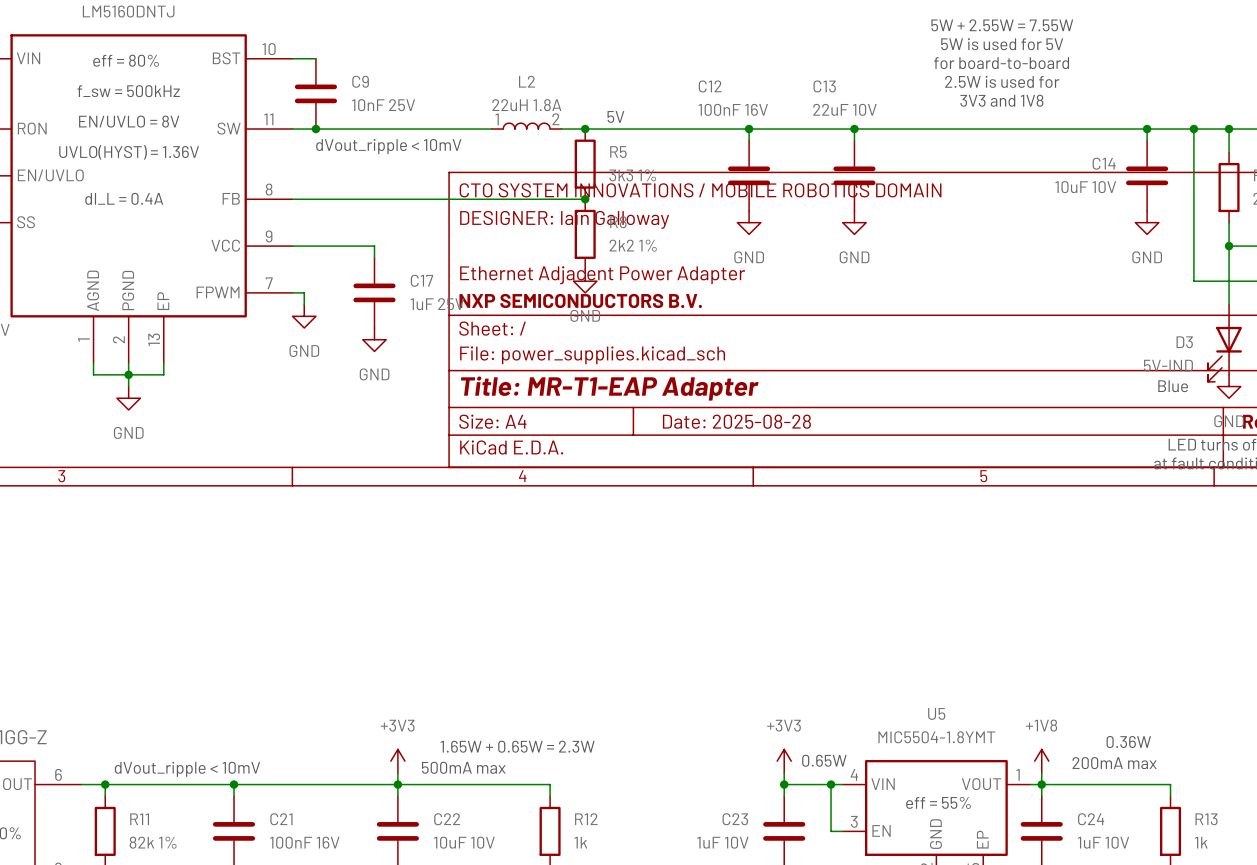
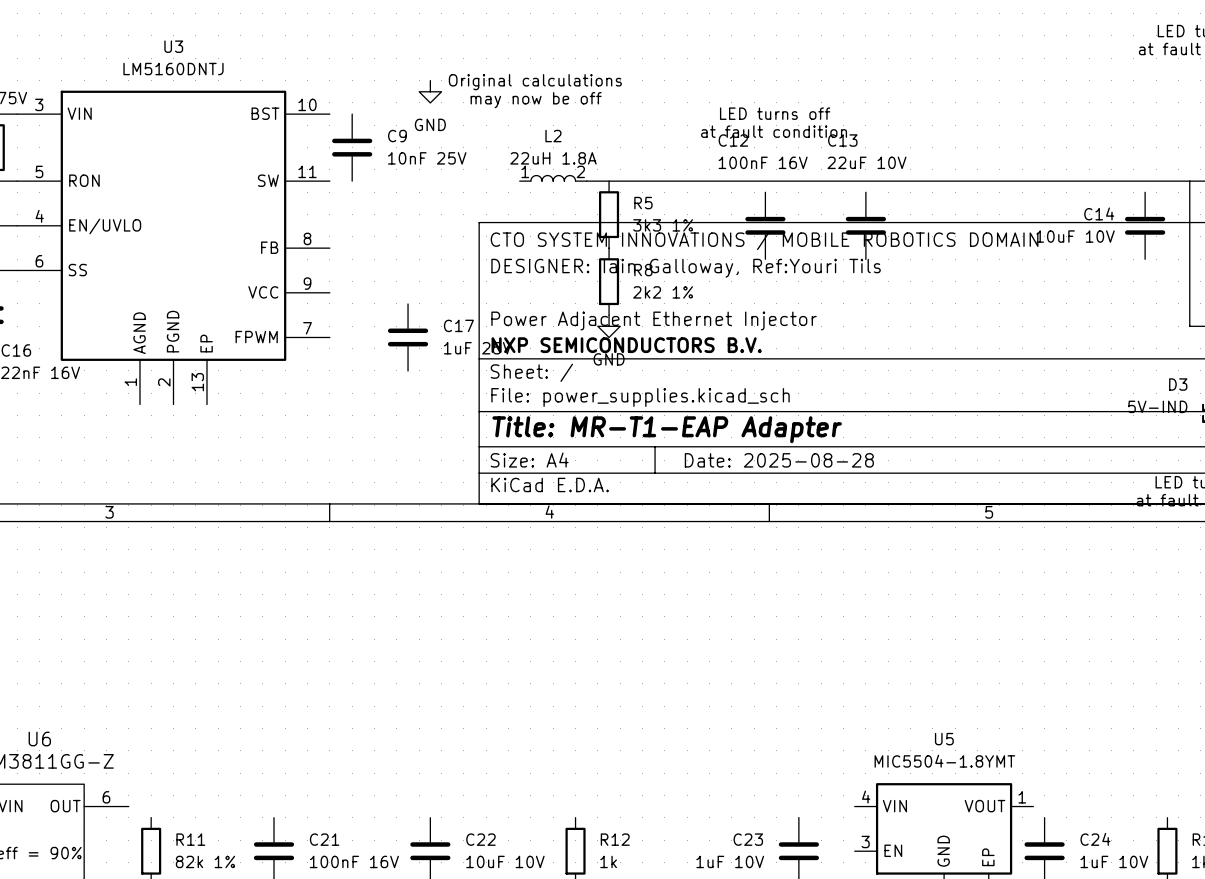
text: none -> Original calculations (535, 82)
text: 5W + 2.55W = 7.55W (1002, 25) -> none
power symbol: none -> GND (430, 91)
text: none -> may now be off (536, 100)
text: 5W is used for 5V (1002, 44) -> none
wire: (292, 58) (315, 58) -> none
text: none -> LED turns off (775, 113)
text: eff = 80% (126, 60) -> none
text: for board-to-board (1001, 63) -> none
text: none -> at fault condition (774, 131)
text: 2.5W is used for (1002, 81) -> none
text: f_sw = 500kHz (128, 91) -> none
text: 3V3 and 1V8 (1001, 100) -> none
text: 5V (615, 116) -> none
text: EN/UVLO = 8V (129, 121) -> none
wire: (292, 129) (491, 129) -> none
junction: (315, 129) -> none
junction: (585, 129) -> none
wire: (749, 129) (749, 140) -> none
junction: (749, 129) -> none
wire: (854, 129) (854, 140) -> none
junction: (854, 129) -> none
wire: (1147, 129) (1147, 140) -> none
junction: (1147, 129) -> none
junction: (1193, 129) -> none
text: dVout_ripple < 10mV (388, 146) -> none
text: UVLO(HYST) = 1.36V (129, 152) -> none
text: dI_L = 0.4A (124, 198) -> none
wire: (292, 199) (585, 199) -> none
junction: (585, 199) -> none
title block: DESIGNER: Iain Galloway (564, 219) -> DESIGNER: Iain Galloway, Ref:Youri Tils (686, 268)
power symbol: GND (749, 222) -> none
power symbol: GND (854, 222) -> none
power symbol: GND (1147, 222) -> none
wire: (292, 246) (374, 246) (374, 257) -> none
title block: Ethernet Adjacent Power Adapter (602, 275) -> Power Adjacent Ethernet Injector (654, 320)
wire: (292, 292) (304, 292) (304, 304) -> none
power symbol: GND (304, 316) -> none
power symbol: GND (374, 339) -> none
wire: (93, 363) (93, 374) (163, 374) (163, 363) -> none
wire: (128, 363) (128, 386) -> none
junction: (128, 374) -> none
text: Blue (1173, 386) -> none
power symbol: GND (128, 398) -> none
text: 0.36W (1128, 742) -> none
text: 1.65W + 0.65W = 2.3W (517, 746) -> none
text: 0.65W (824, 760) -> none
power symbol: +3V3 (397, 761) -> none
power symbol: +3V3 (784, 761) -> none
power symbol: +1V8 (1041, 761) -> none
text: 200mA max (1114, 763) -> none
text: 500mA max (463, 767) -> none
text: dVout_ripple < 10mV (187, 769) -> none
wire: (397, 772) (397, 796) -> none
wire: (784, 772) (784, 796) -> none
wire: (1041, 772) (1041, 796) -> none
wire: (81, 784) (550, 784) (550, 796) -> none
wire: (105, 784) (105, 796) -> none
junction: (105, 784) -> none
wire: (234, 784) (234, 796) -> none
junction: (234, 784) -> none
junction: (397, 784) -> none
wire: (784, 784) (842, 784) -> none
junction: (784, 784) -> none
wire: (831, 784) (831, 831) (842, 831) -> none
junction: (831, 784) -> none
wire: (1030, 784) (1170, 784) (1170, 796) -> none
junction: (1041, 784) -> none
text: eff = 55% (938, 802) -> none

